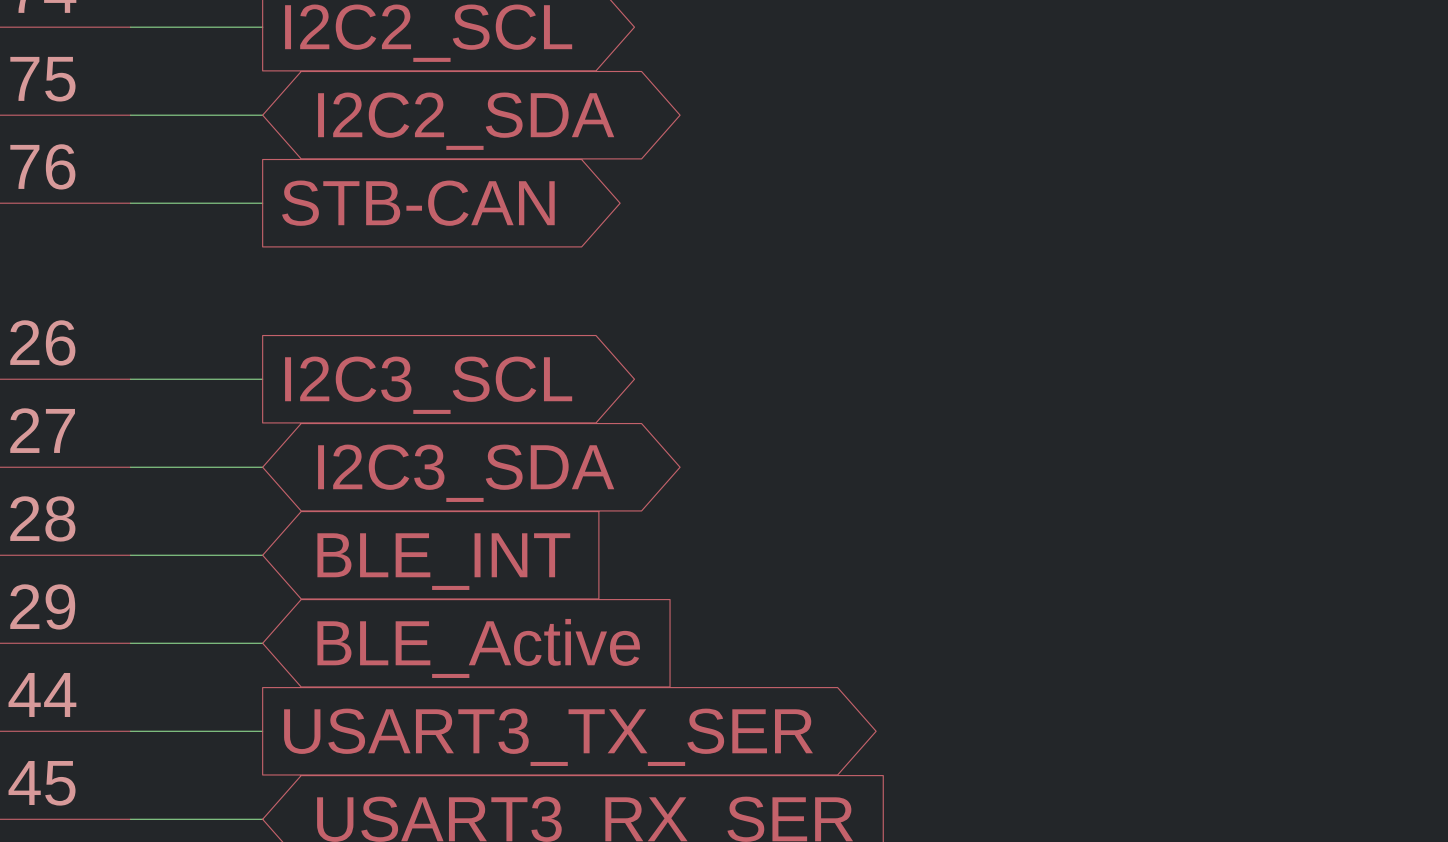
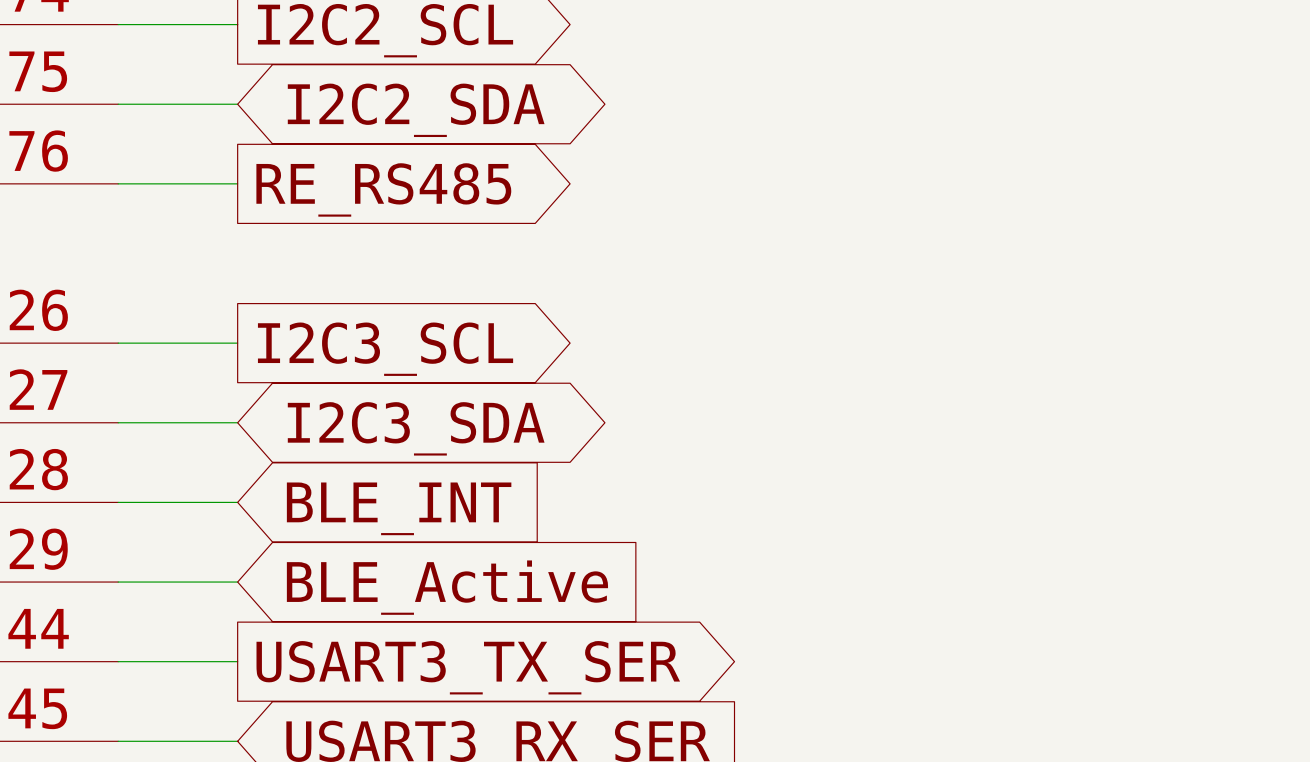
global label: STB-CAN (418, 203) -> RE_RS485 (383, 189)

